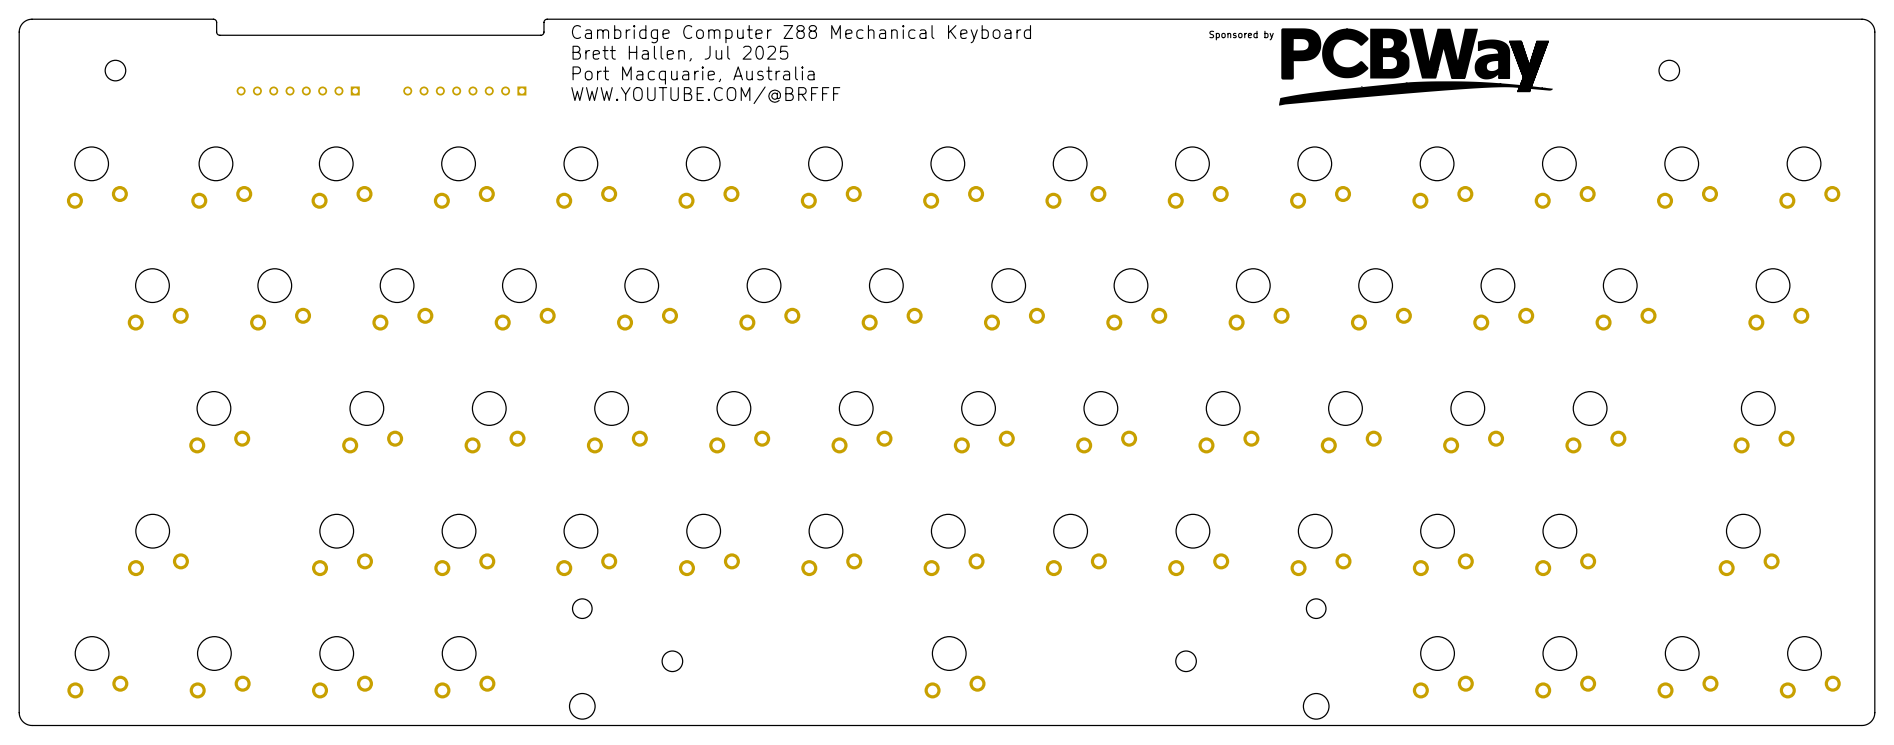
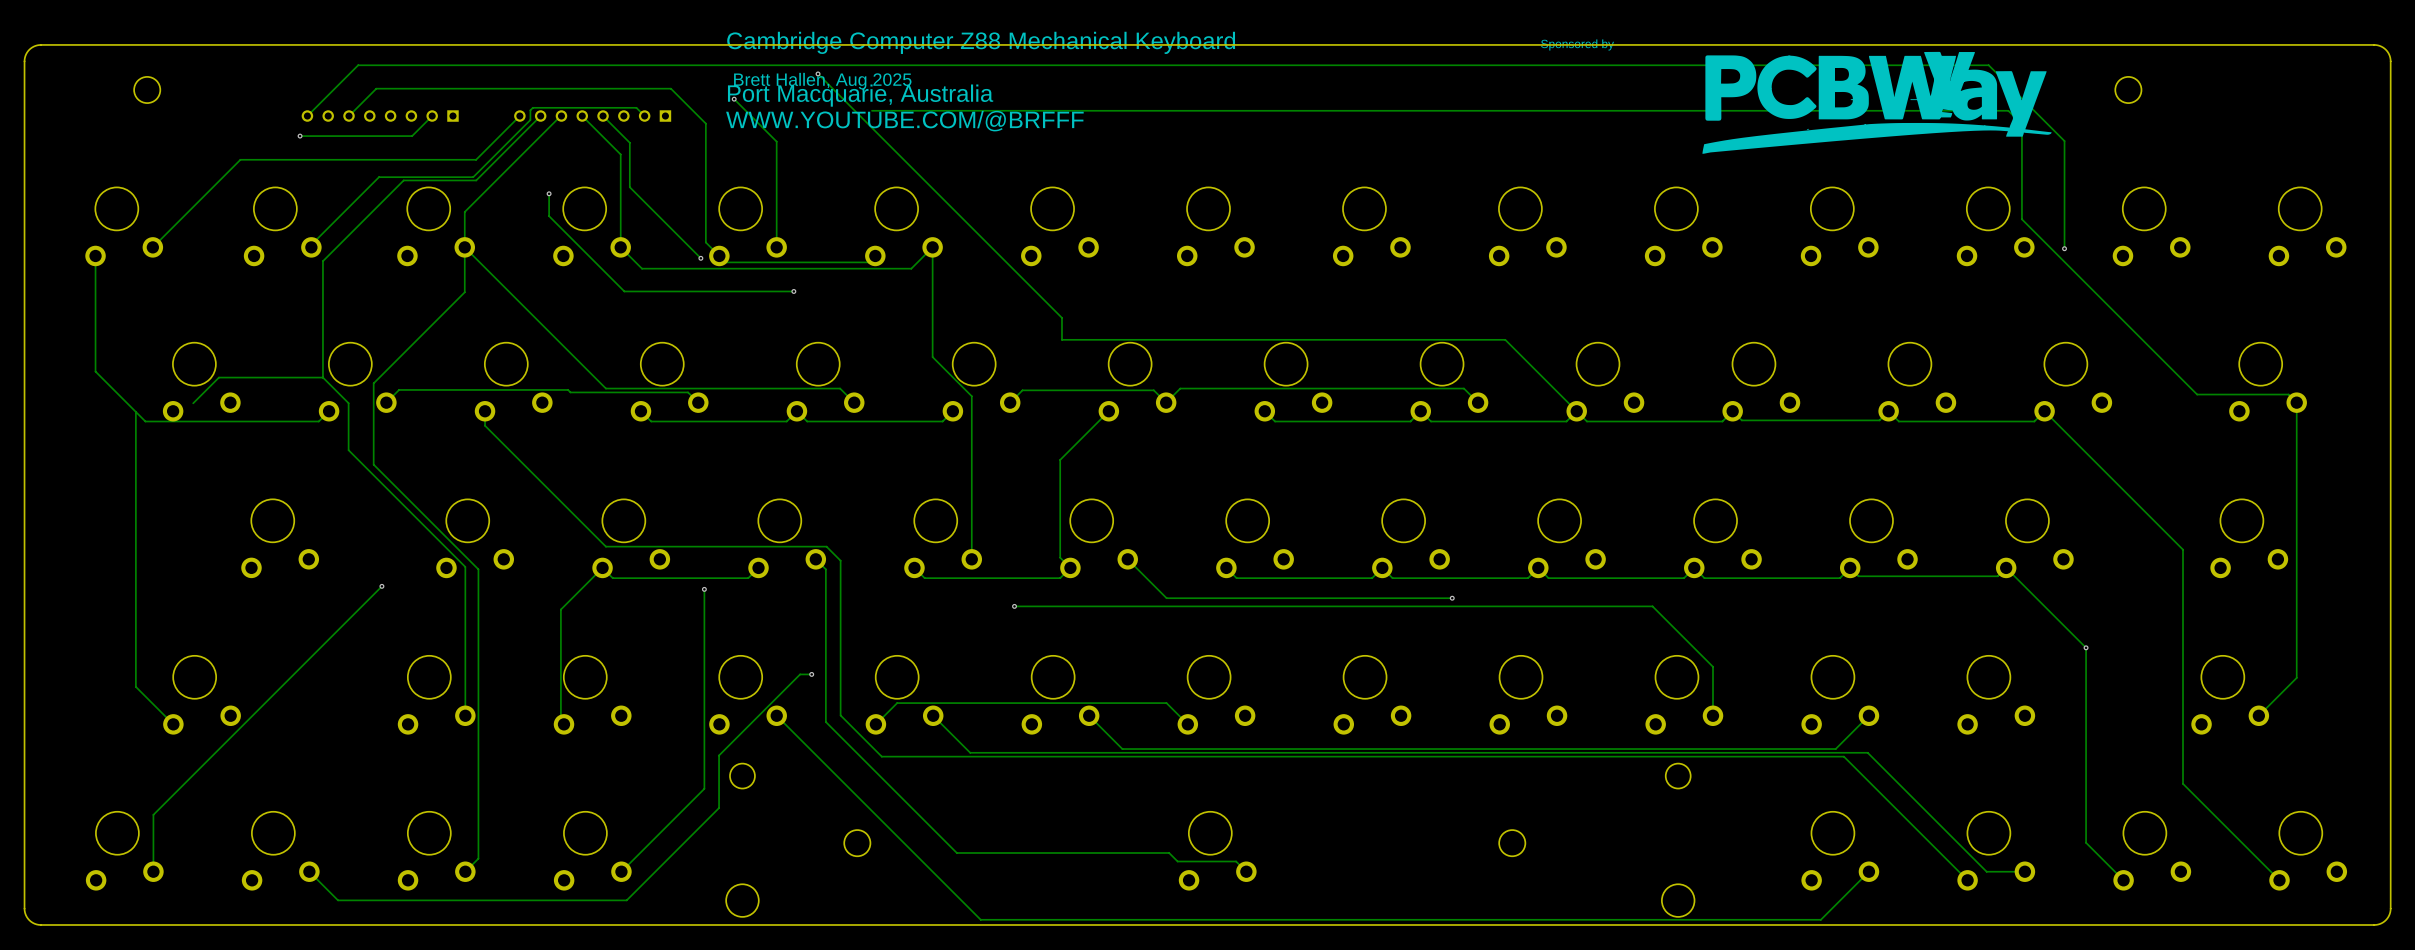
board edge: (540, 35) (543, 32) (544, 21) (547, 19) (1862, 19) (1868, 20) (1873, 25) (1874, 32) (1873, 718) (1868, 723) (1861, 725) (26, 724) (21, 719) (19, 712) (19, 28) (24, 21) (31, 19) (213, 19) (216, 21) (216, 33) (219, 35) -> (689, 44) (2374, 44) (2381, 46) (2388, 52) (2390, 61) (2390, 908) (2389, 915) (2383, 922) (2374, 925) (34, 923) (27, 918) (24, 908) (24, 57) (30, 48) (40, 44) (280, 44)
text: Brett Hallen, Jul 2025 (680, 53) -> Brett Hallen, Aug 2025 (822, 81)
drawing position: (1301, 53) -> (1730, 88)
drawing position: (1345, 53) -> (1786, 87)
drawing position: (1389, 53) -> (1843, 87)
drawing position: (1443, 53) -> (1912, 87)
track: none -> (818, 73) (1061, 317) (1061, 339) (1505, 339) (1586, 421) (1722, 421) (1732, 411) (1741, 420) (1879, 420) (1888, 411) (1898, 421) (2034, 421) (2044, 411) (2183, 549) (2183, 783) (2279, 880)
via: none -> (818, 73)
drawing position: (1492, 59) -> (1974, 95)
drawing position: (1415, 73) -> (1877, 112)
track: none -> (734, 99) (776, 141) (776, 247)
via: none -> (734, 99)
track: none -> (871, 110) (2008, 110) (2021, 124) (2021, 219) (2197, 394) (2288, 394) (2296, 402) (2296, 677) (2258, 715)
drawing position: (1361, 86) -> (1808, 129)
track: none -> (307, 116) (358, 65) (1988, 65) (2064, 141) (2064, 248)
track: none -> (349, 116) (376, 88) (670, 88) (705, 123) (705, 242) (725, 262) (868, 262) (875, 255)
track: none -> (432, 116) (412, 136) (300, 136)
track: none -> (561, 115) (464, 211) (464, 292) (373, 383) (373, 464) (478, 569) (478, 858) (465, 871)
track: none -> (582, 115) (620, 154) (620, 247) (642, 268) (911, 268) (932, 247) (932, 357) (971, 396) (971, 559)
track: none -> (602, 115) (629, 142) (629, 187) (700, 258)
track: none -> (644, 116) (636, 107) (532, 107) (530, 110) (530, 119) (473, 177) (379, 177) (308, 247)
track: none -> (519, 116) (476, 159) (240, 159) (152, 247)
track: none -> (540, 116) (476, 180) (403, 180) (322, 261) (322, 377)
via: none -> (300, 136)
track: none -> (549, 193) (549, 216) (624, 291) (793, 291)
via: none -> (549, 193)
track: none -> (464, 247) (605, 388) (840, 388) (854, 402)
via: none -> (2064, 248)
via: none -> (700, 258)
track: none -> (100, 260) (95, 255) (95, 371) (145, 421) (318, 421) (329, 411)
via: none -> (793, 291)
track: none -> (322, 377) (218, 377) (193, 403)
track: none -> (322, 377) (348, 403) (348, 450) (465, 566) (465, 715)
track: none -> (698, 402) (688, 392) (570, 392) (568, 389) (399, 389) (386, 402)
track: none -> (1478, 402) (1463, 388) (1180, 388) (1166, 402) (1153, 390) (1022, 390) (1010, 402)
track: none -> (485, 411) (485, 425) (605, 546) (826, 546) (840, 560) (840, 715) (881, 756) (1843, 756) (1967, 880)
track: none -> (952, 411) (942, 421) (807, 421) (796, 411) (786, 421) (651, 421) (640, 411)
track: none -> (1108, 411) (1060, 459) (1060, 557) (1070, 567) (1060, 578) (924, 578) (914, 567)
track: none -> (1576, 411) (1566, 421) (1431, 421) (1420, 411) (1410, 421) (1275, 421) (1264, 411)
track: none -> (135, 411) (135, 686) (173, 724)
track: none -> (815, 559) (825, 569) (825, 722) (956, 852) (1169, 852) (1177, 861) (1236, 861) (1246, 871)
track: none -> (1127, 559) (1166, 598) (1452, 598)
track: none -> (758, 567) (748, 578) (612, 578) (602, 567) (560, 609) (560, 721) (563, 724)
track: none -> (1226, 567) (1236, 578) (1372, 578) (1382, 567) (1392, 578) (1528, 578) (1538, 567) (1548, 578) (1684, 578) (1694, 567) (1704, 578) (1839, 578) (1850, 567) (1858, 576) (1997, 576) (2006, 567) (2086, 647) (2086, 842) (2123, 880)
track: none -> (381, 586) (153, 814) (153, 871)
via: none -> (381, 586)
track: none -> (704, 589) (704, 788) (621, 871)
via: none -> (704, 589)
via: none -> (1452, 598)
track: none -> (1014, 606) (1652, 606) (1712, 666) (1712, 715)
via: none -> (1014, 606)
via: none -> (2086, 647)
track: none -> (811, 674) (800, 674) (719, 755) (719, 808) (626, 900) (338, 900) (309, 871) (314, 866)
via: none -> (811, 674)
track: none -> (776, 715) (980, 919) (1820, 919) (1868, 871)
track: none -> (933, 715) (970, 752) (1867, 752) (1986, 871) (2024, 871)
track: none -> (1868, 715) (1835, 749) (1122, 749) (1089, 715)
track: none -> (1187, 724) (1166, 703) (897, 703) (875, 724)

